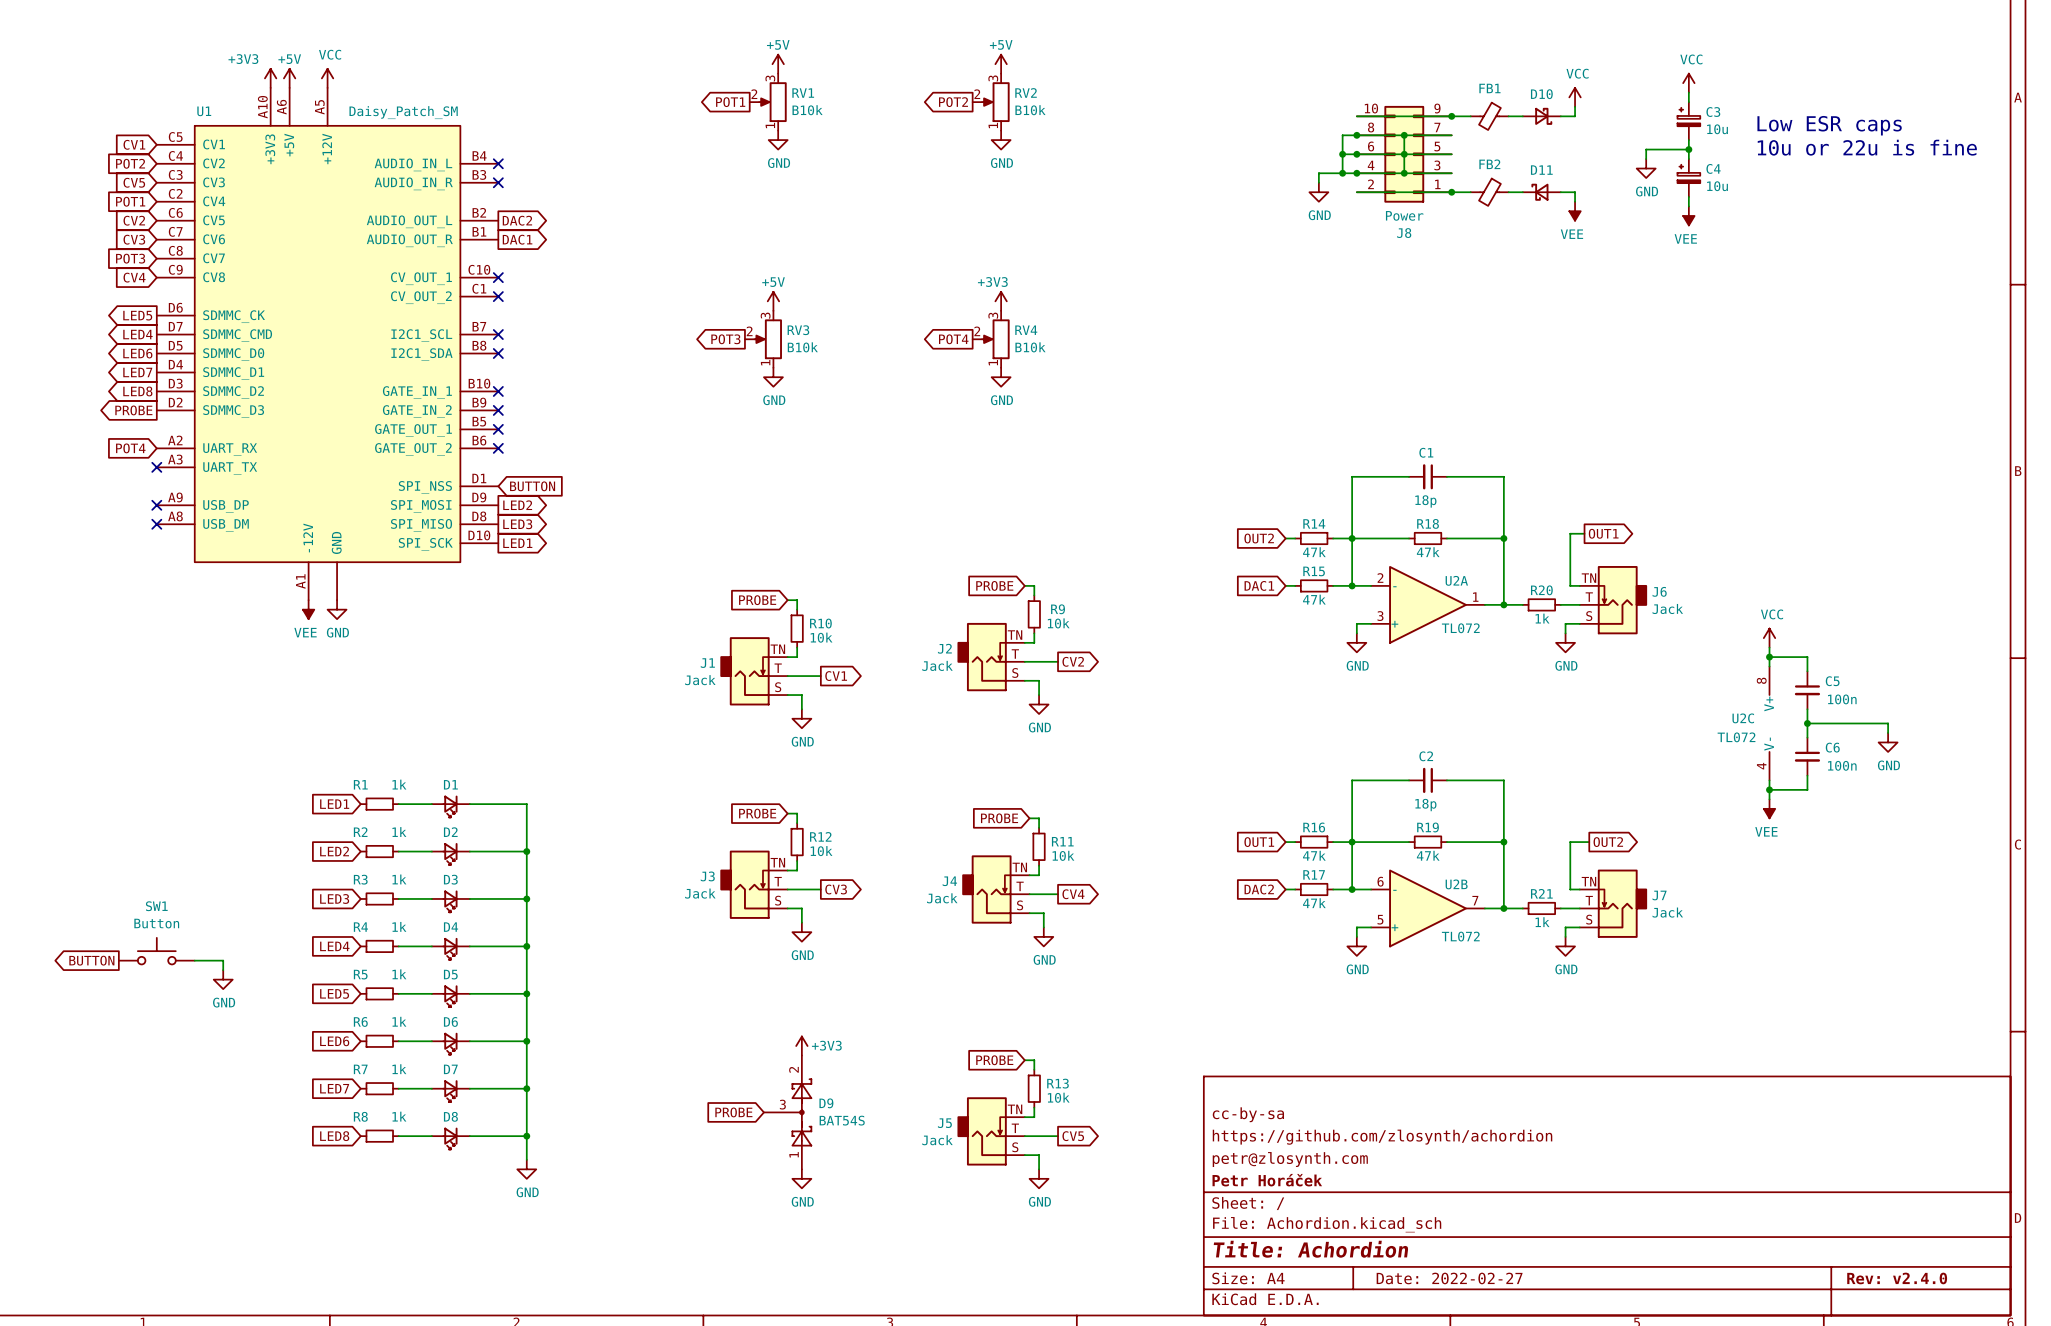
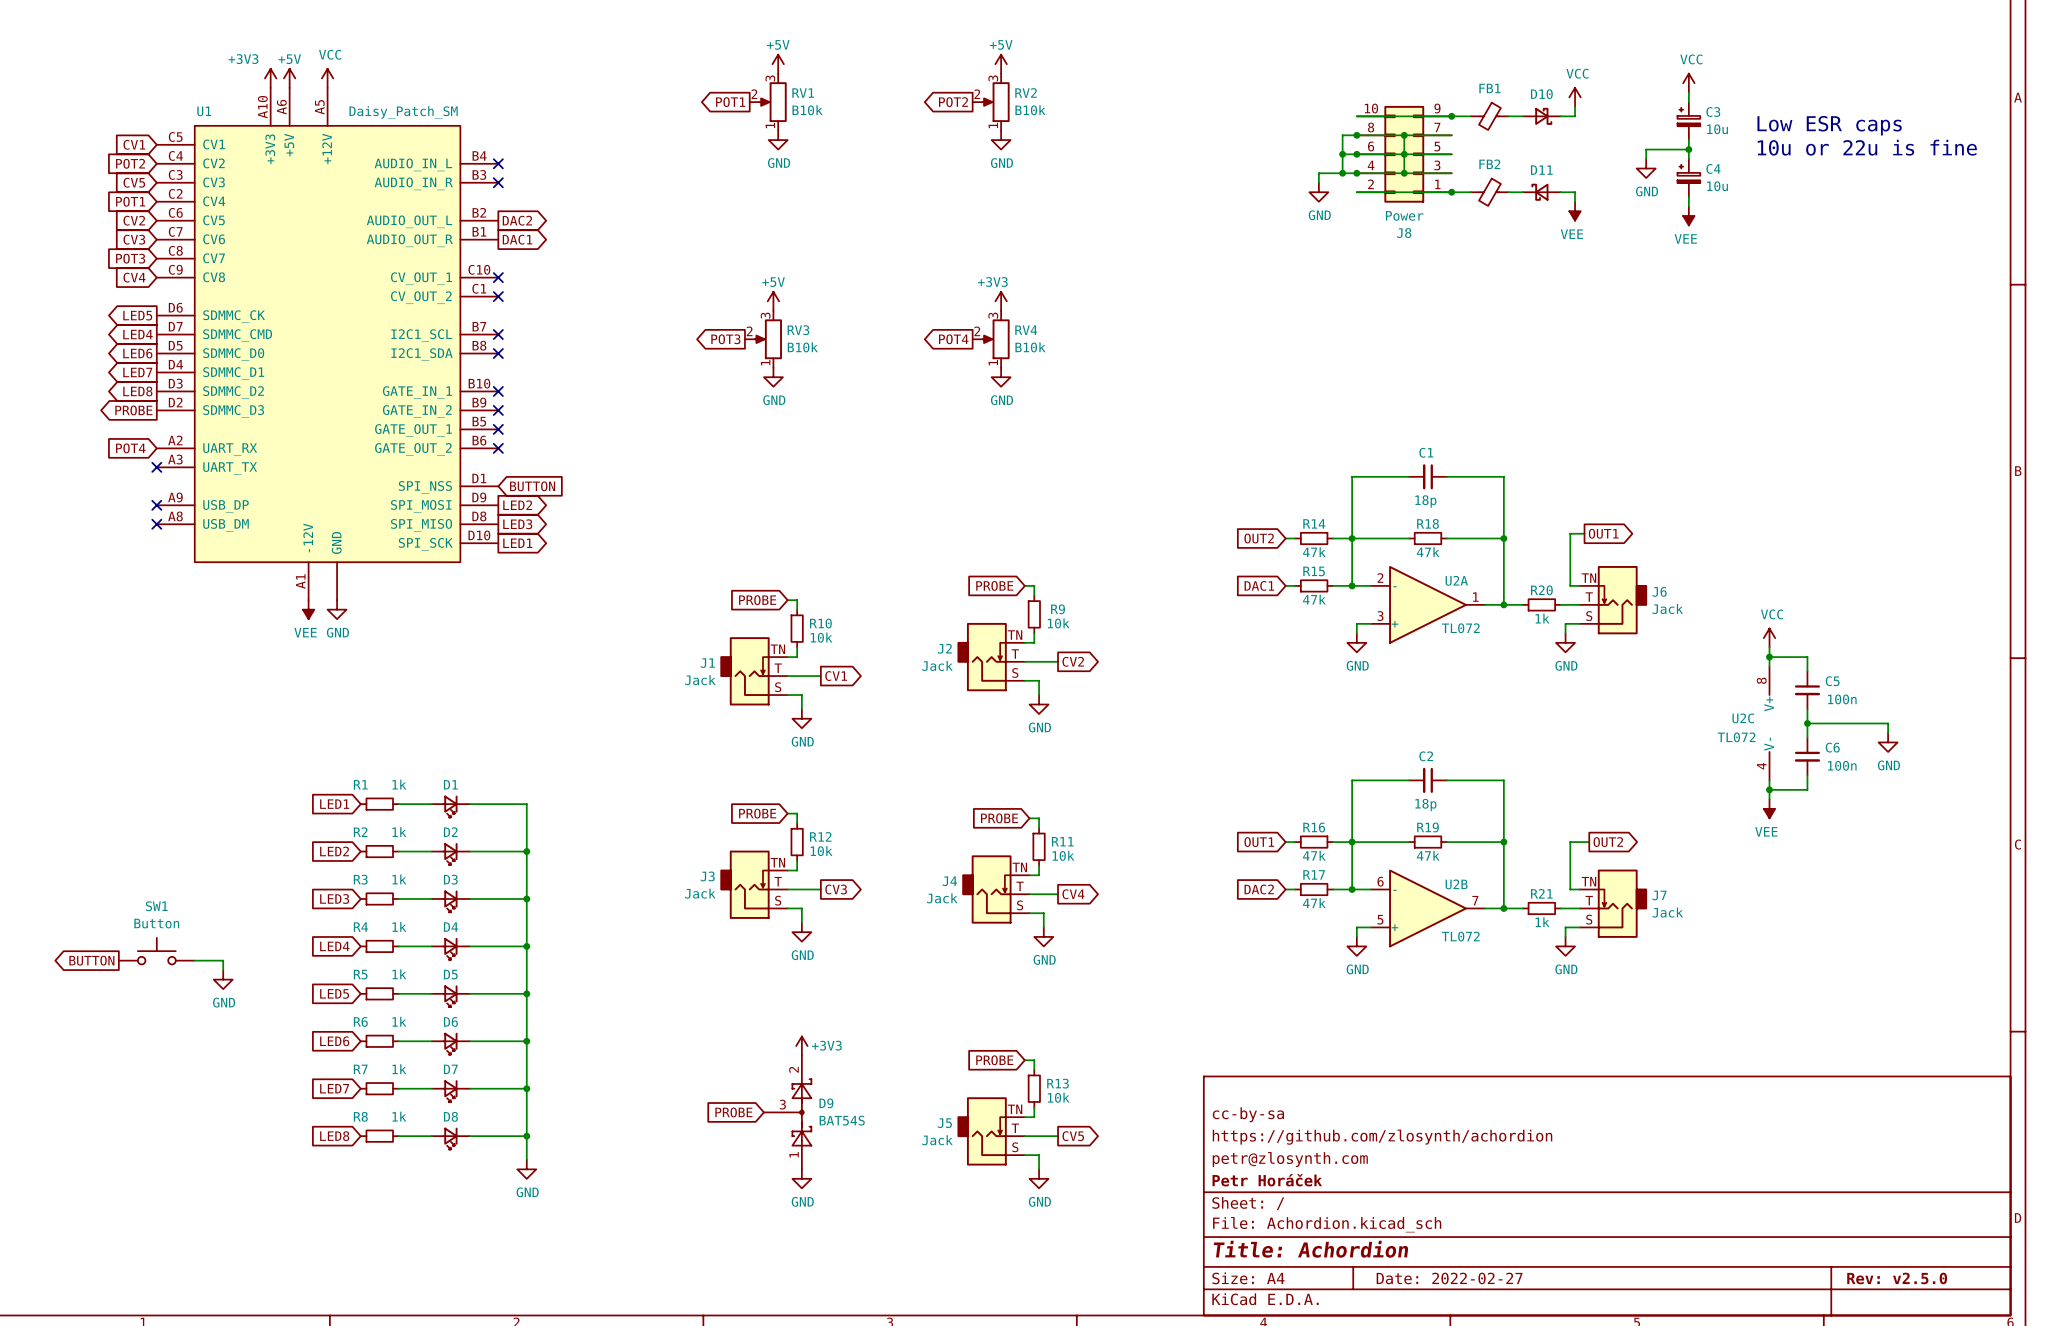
title block: Rev: v2.4.0 (1897, 1278) -> Rev: v2.5.0 (1897, 1278)

